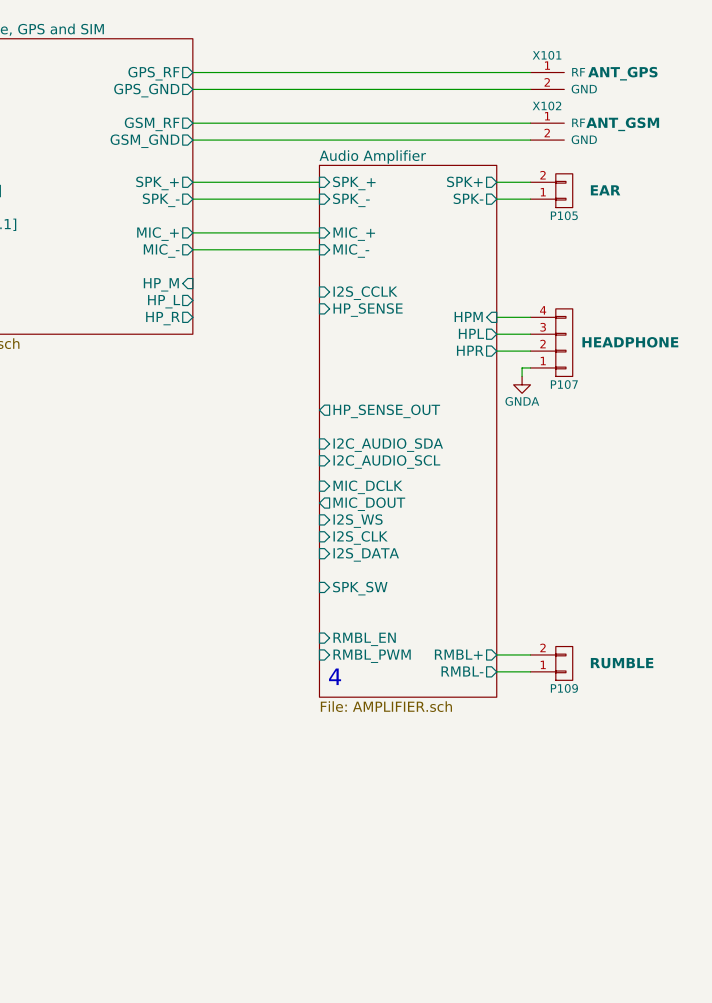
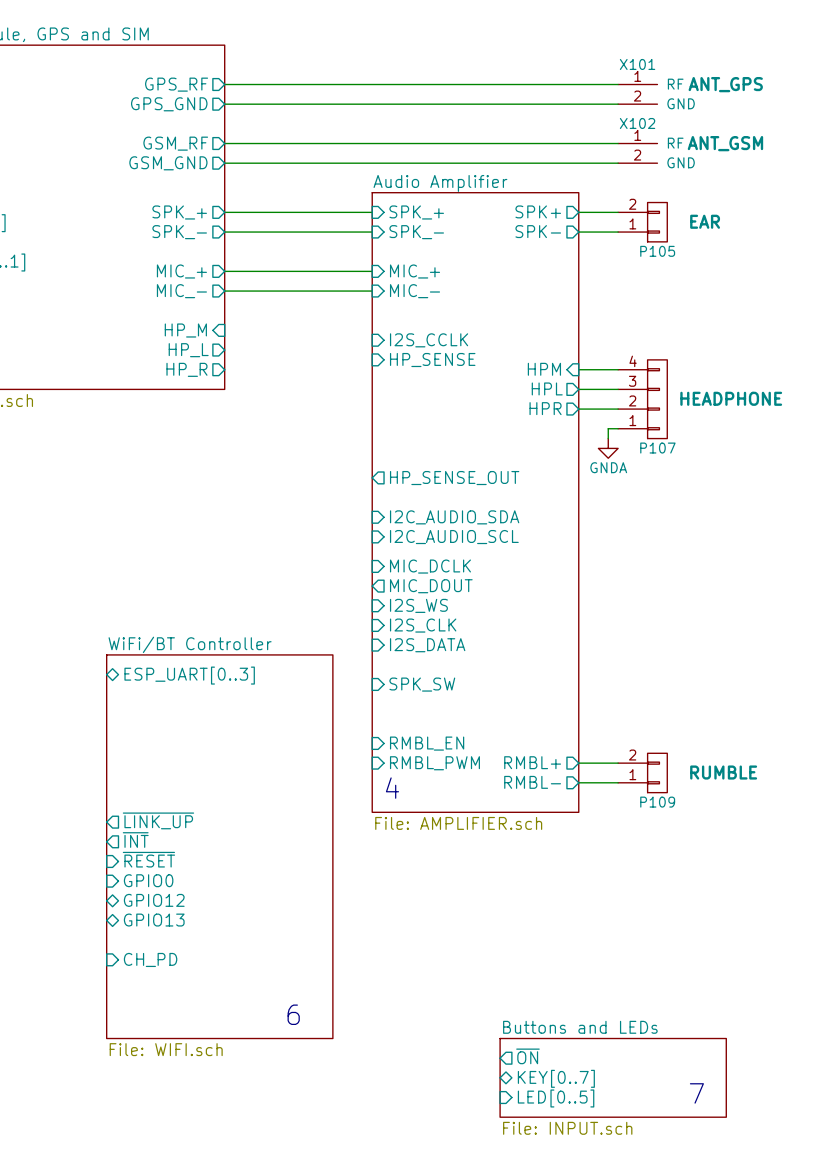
sheet pin: none -> ESP_UART[0..3] (189, 675)
sheet pin: none -> ~{LINK_UP} (158, 820)
sheet pin: none -> ~{INT} (135, 840)
sheet WiFi/BT Controller: none -> File: WIFI.sch (219, 846)
sheet pin: none -> ~{RESET} (148, 859)
sheet pin: none -> GPIO0 (148, 880)
sheet pin: none -> GPIO12 (154, 900)
sheet pin: none -> GPIO13 (154, 920)
sheet pin: none -> CH_PD (150, 959)
text: none -> 6 (293, 1014)
sheet pin: none -> ~{ON} (527, 1056)
sheet pin: none -> KEY[0..7] (556, 1078)
sheet Buttons and LEDs: none -> File: INPUT.sch (613, 1077)
text: none -> 7 (696, 1093)
sheet pin: none -> LED[0..5] (556, 1098)

